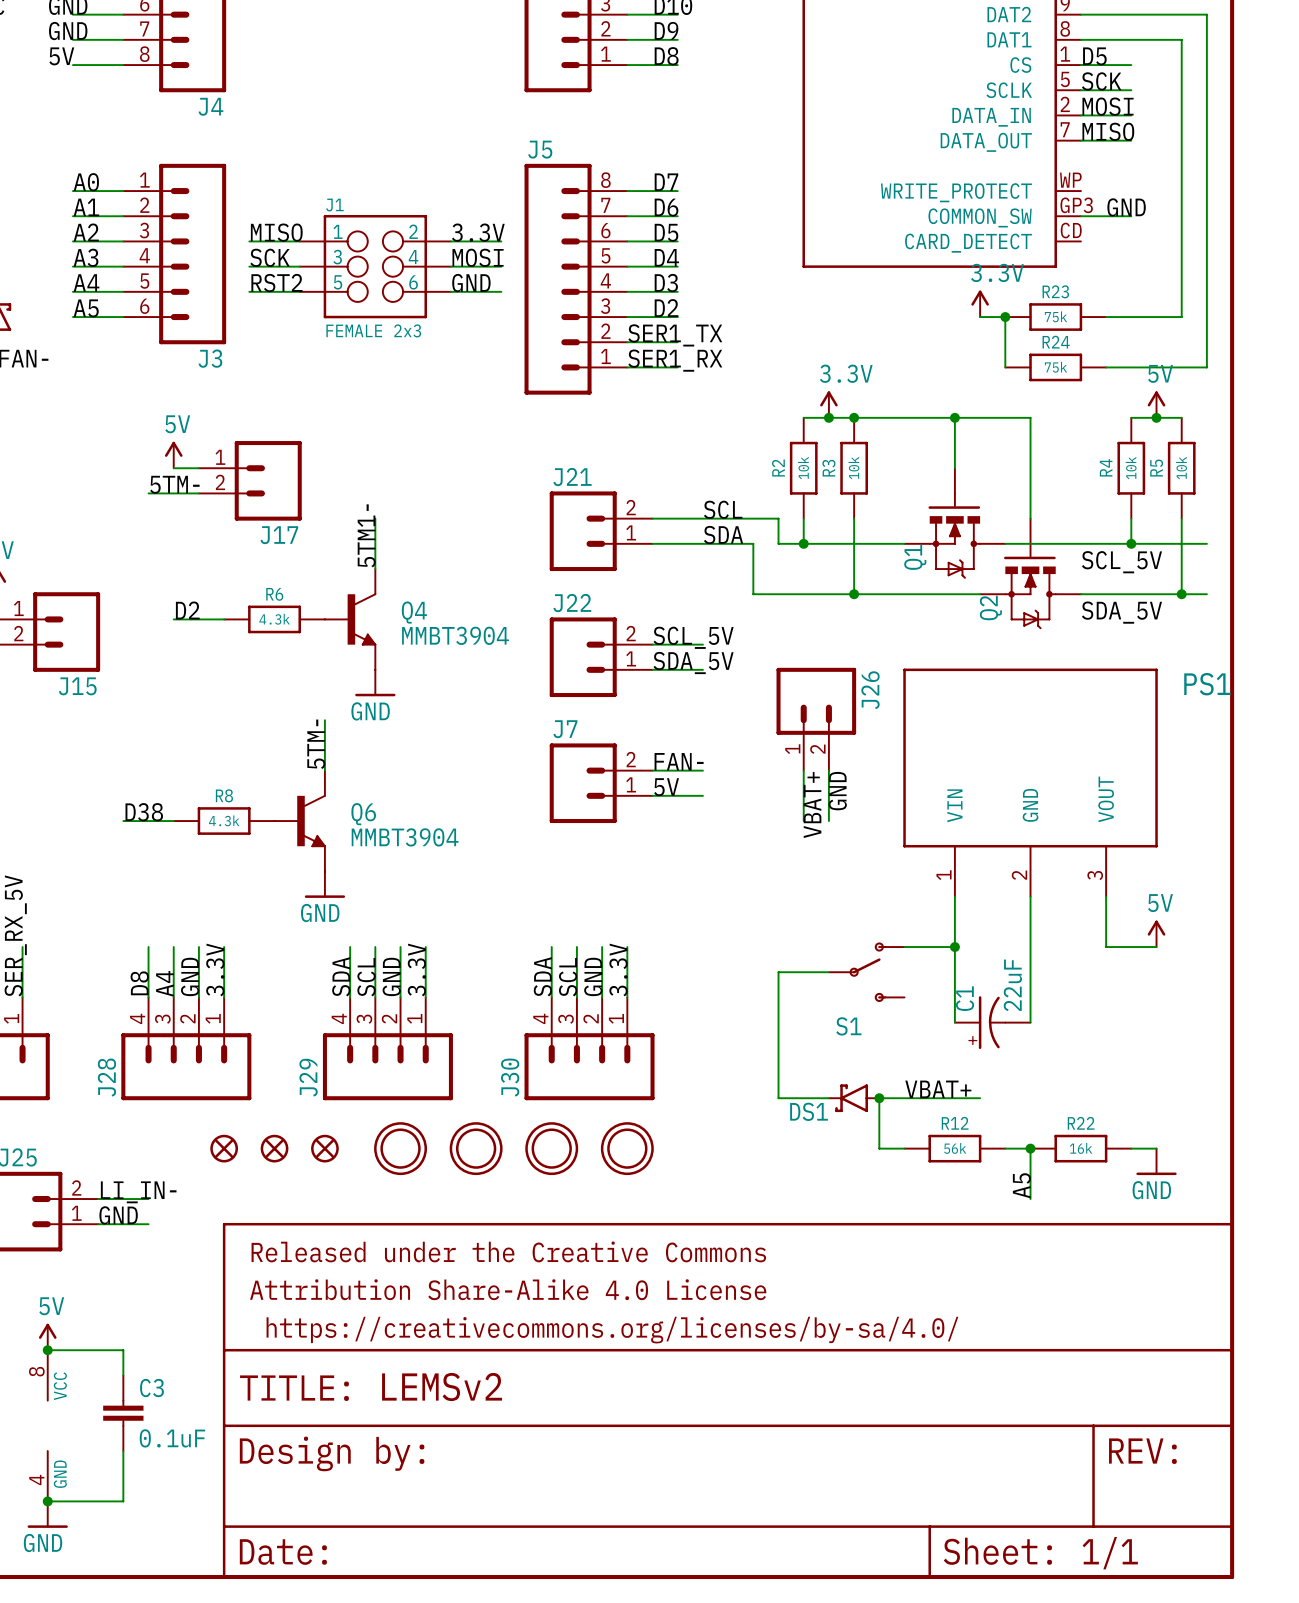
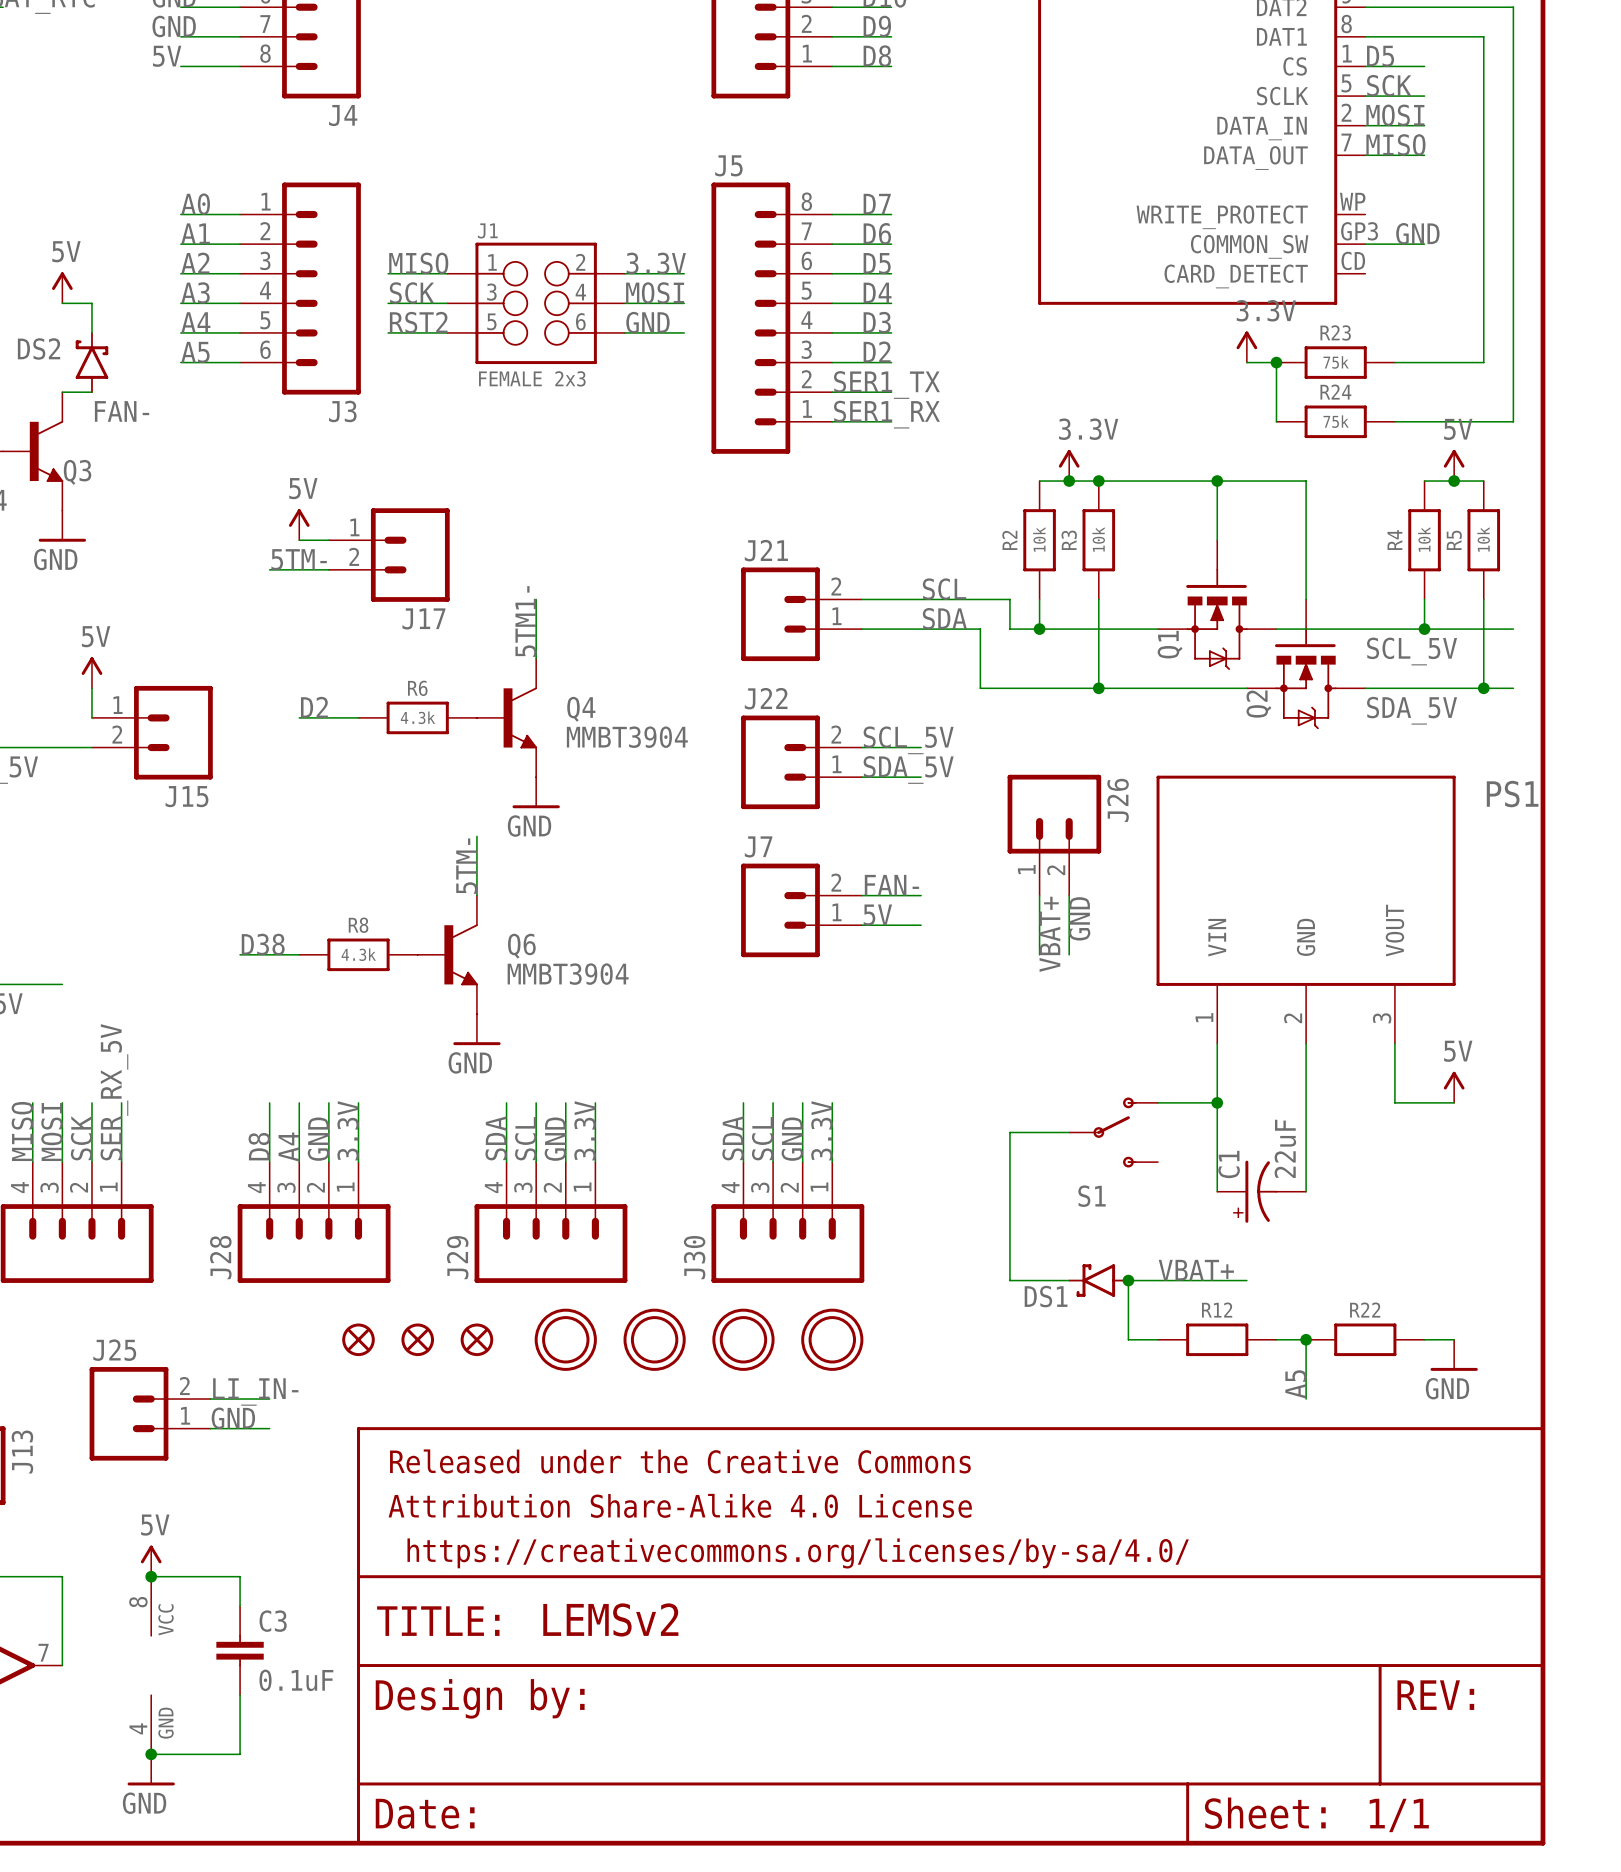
R12 value: 56k (955, 1148) -> none
R22 value: 16k (1081, 1148) -> none

